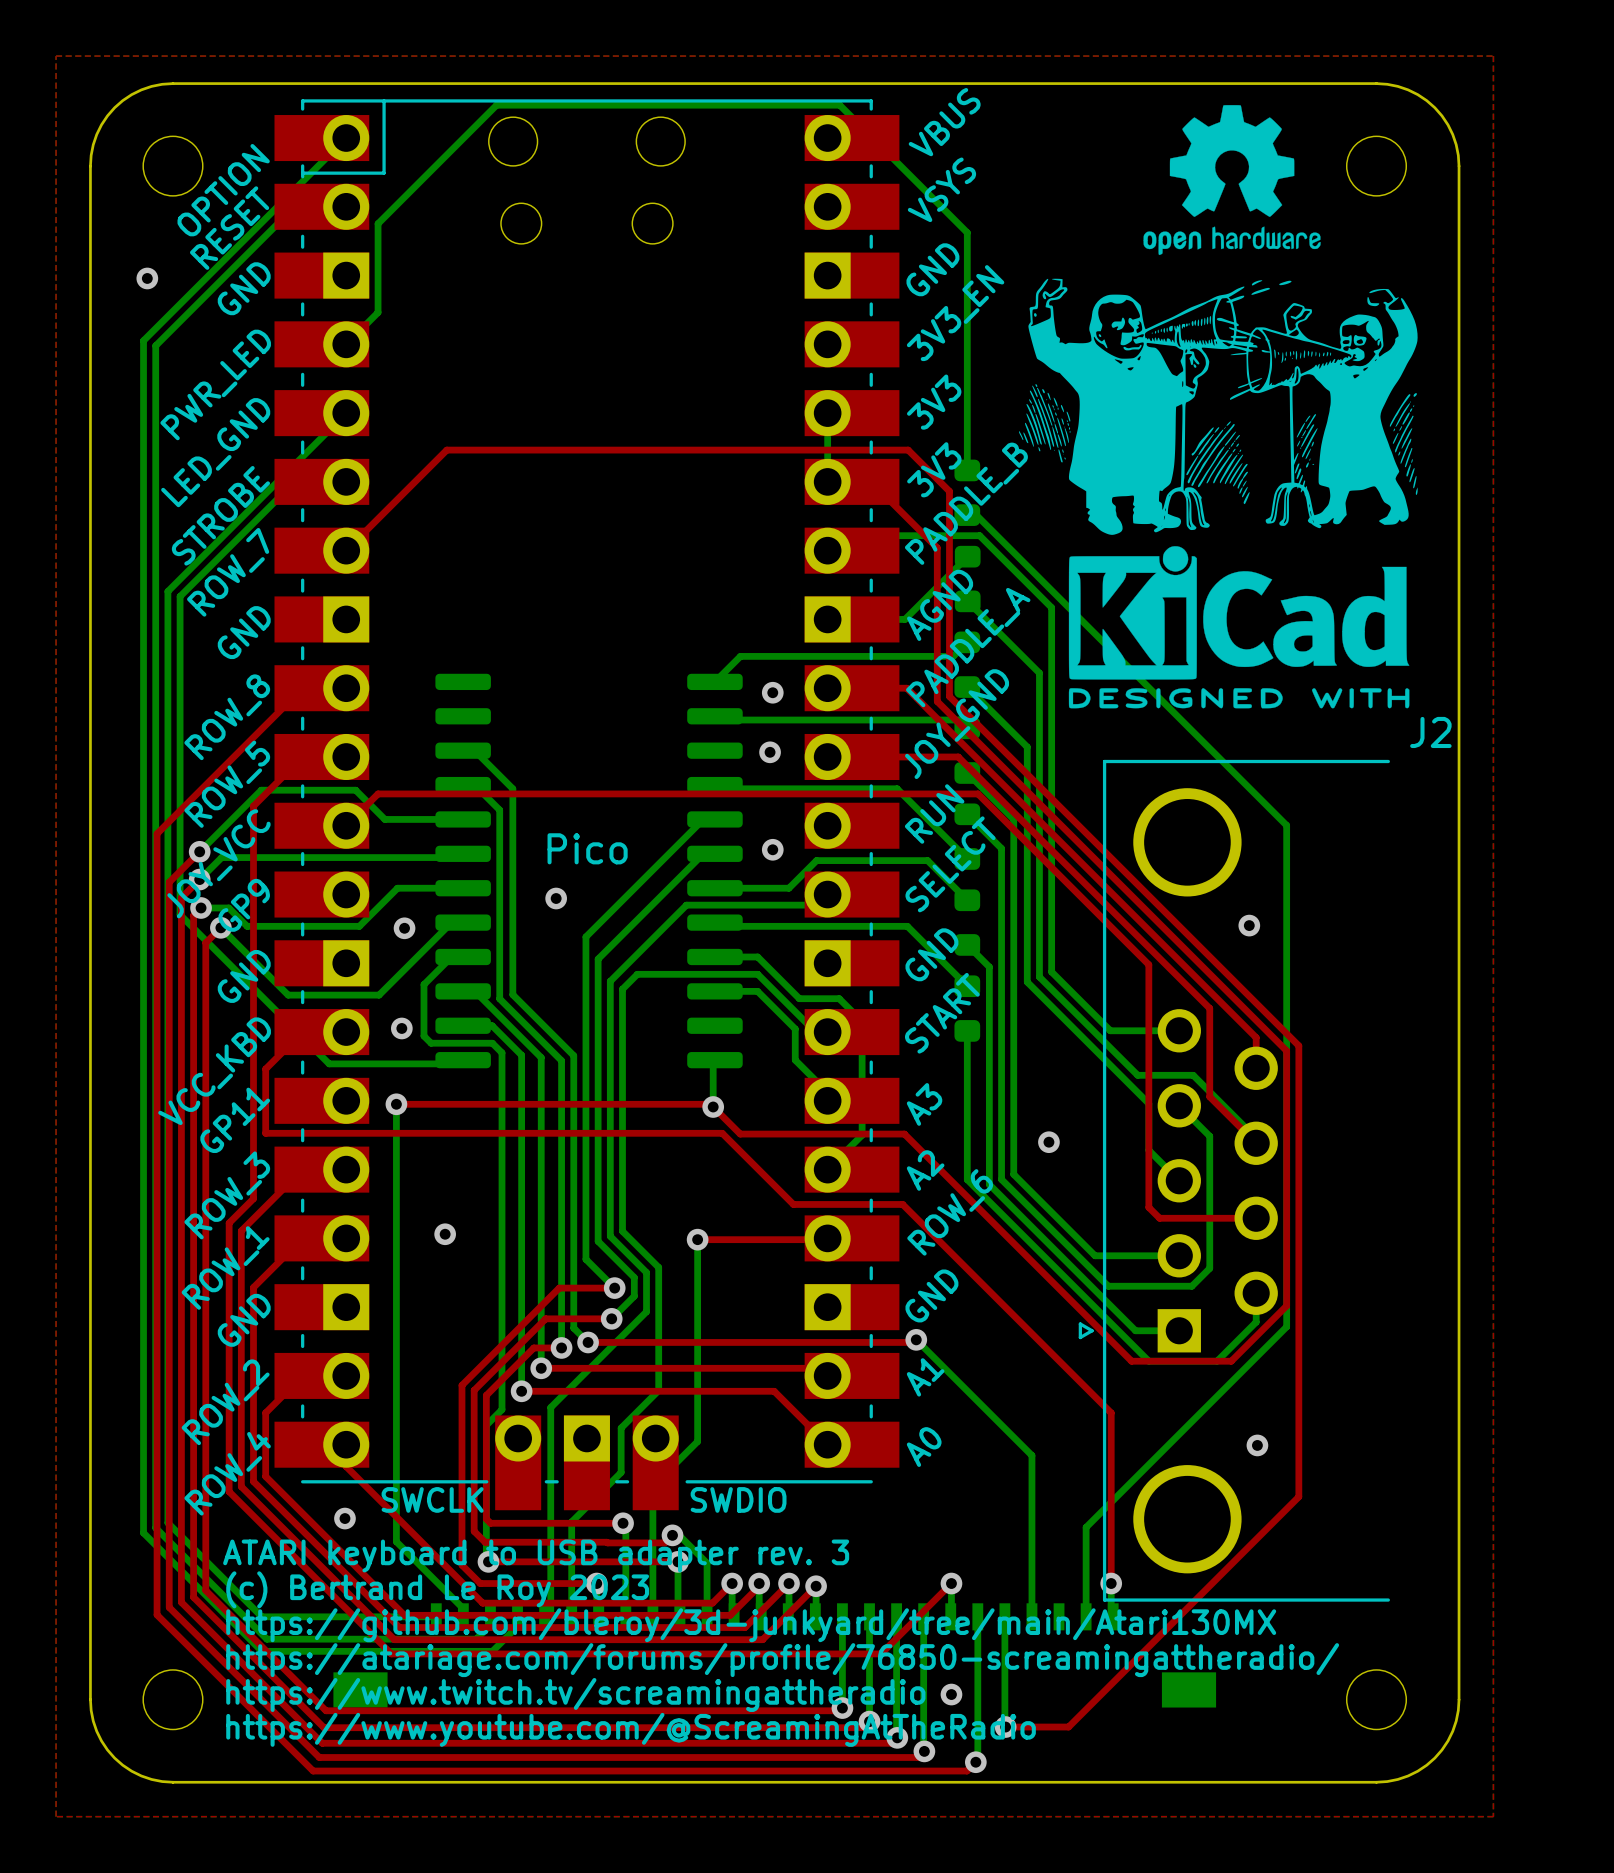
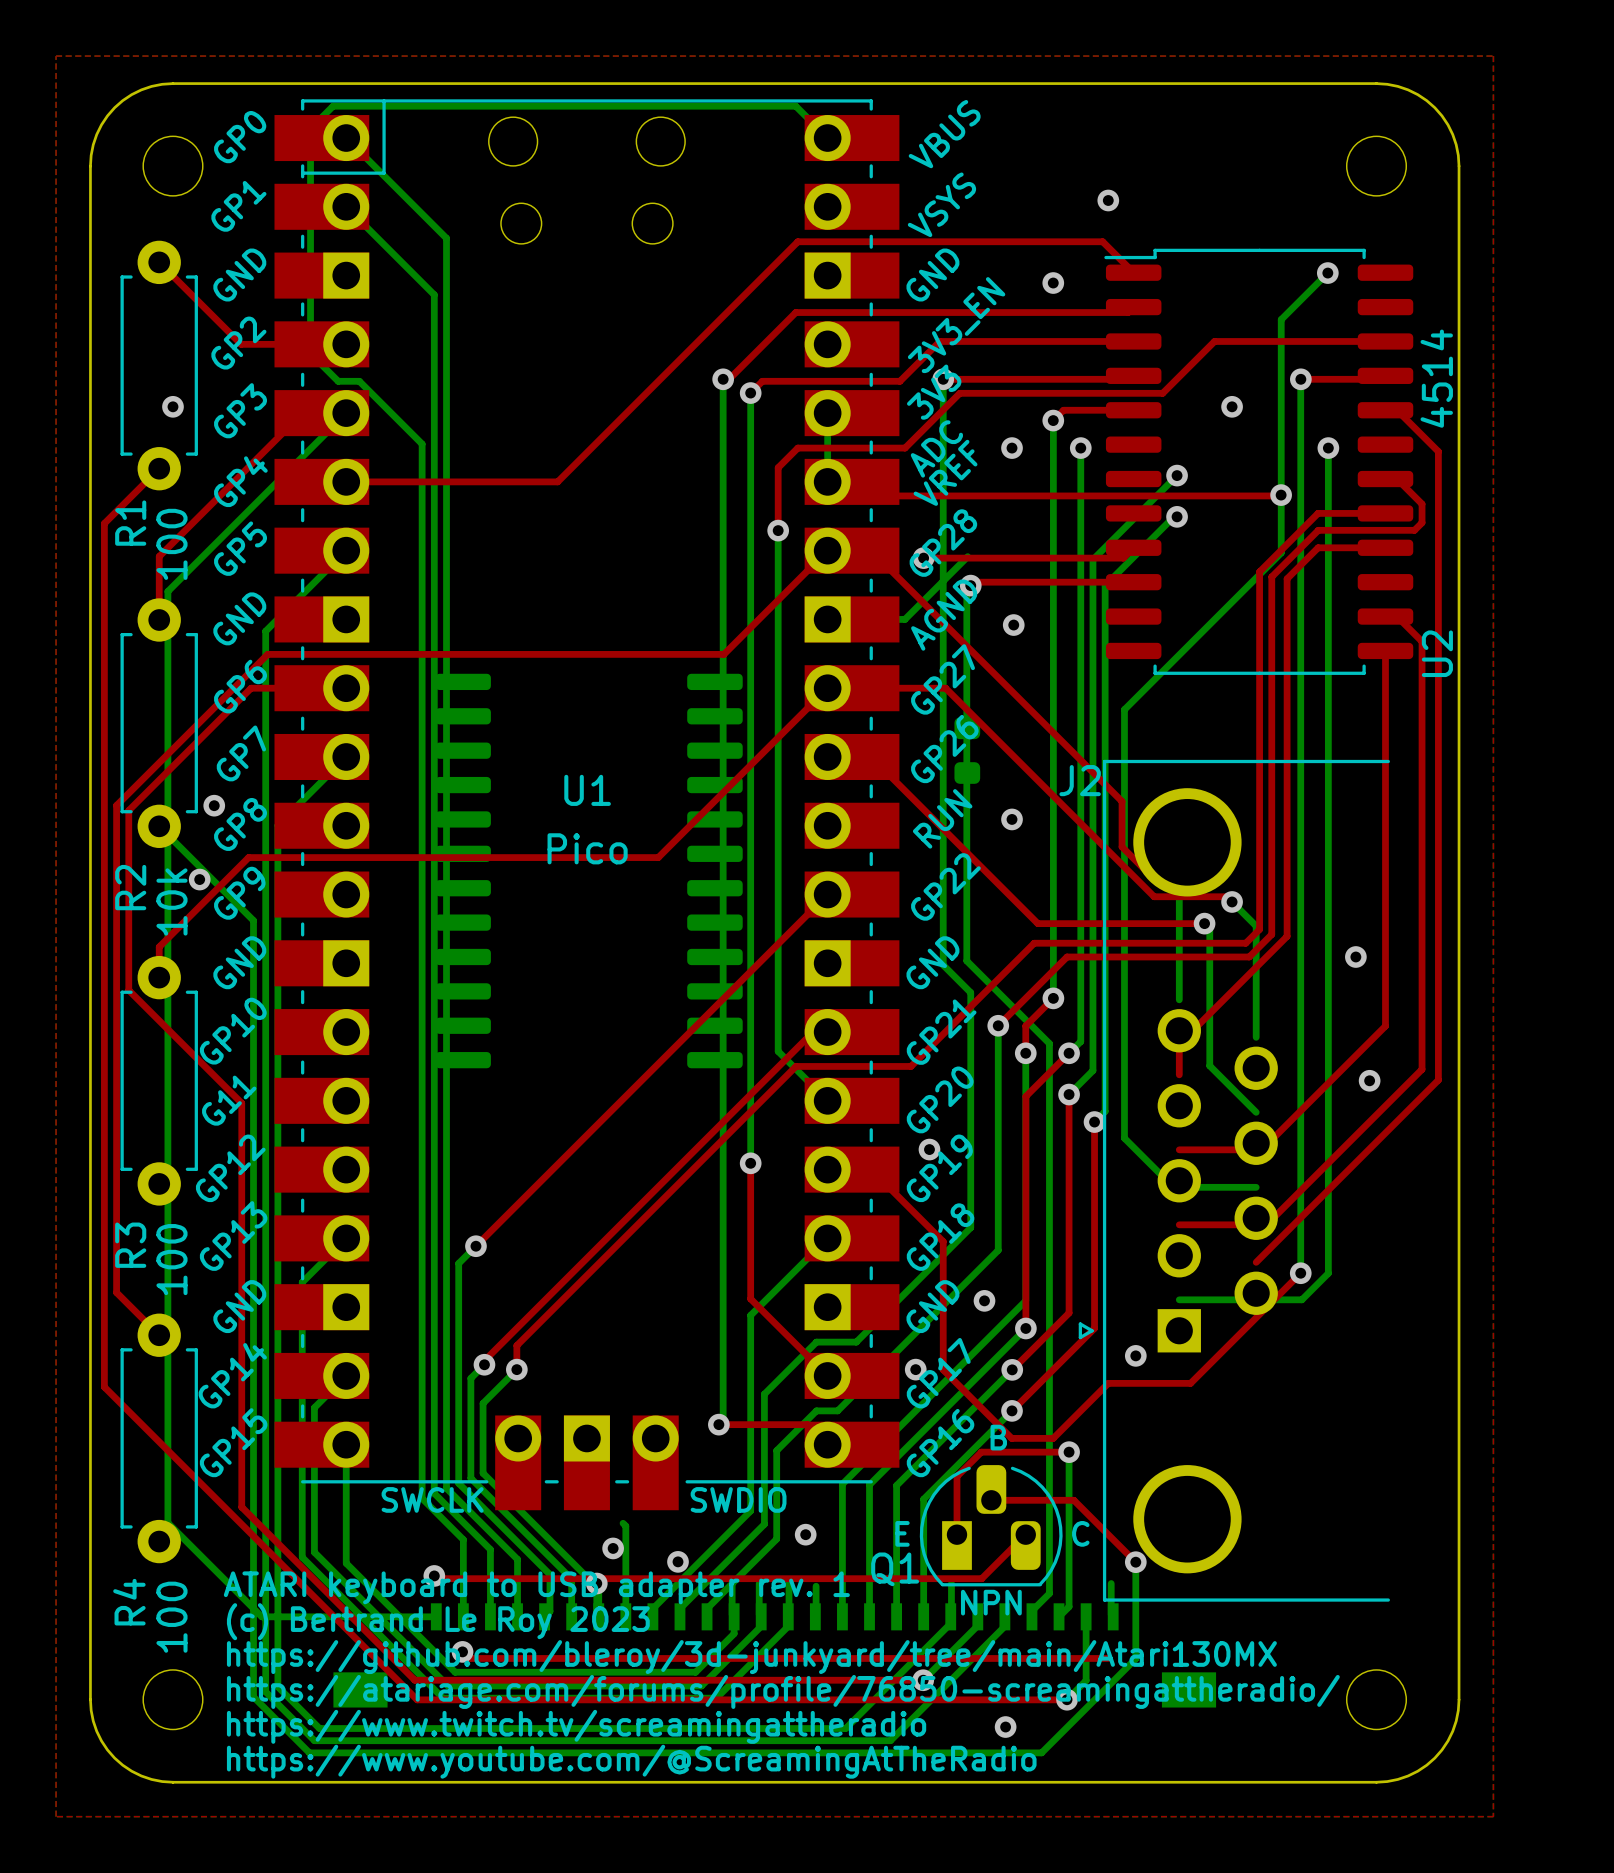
U1 footprint: [274, 99, 900, 1511] -> [274, 99, 900, 1511]
drawing: [1018, 105, 1418, 709] -> none
bottom track: (346, 138) (143, 340) (143, 1532) (261, 1651) (492, 1651) (517, 1626) -> (346, 138) (446, 238) (446, 1488) (517, 1559) (517, 1616)
bottom track: none -> (827, 138) (795, 106) (333, 106) (310, 128) (310, 353) (338, 381) (359, 381) (422, 444) (422, 1498) (463, 1539) (463, 1616)
via: none -> (1108, 200)
bottom track: (346, 206) (294, 206) (155, 345) (155, 1527) (266, 1639) (476, 1639) (490, 1624) -> (346, 206) (434, 294) (434, 1493) (490, 1549) (490, 1616)
top track: none -> (159, 262) (241, 344) (346, 344)
top track: none -> (1133, 272) (1102, 241) (797, 241) (557, 481) (346, 481)
bottom track: none -> (1327, 273) (1281, 319) (1281, 552) (1124, 709) (1124, 1138) (1173, 1187) (1256, 1187)
via: none -> (1327, 273)
via position: (147, 278) -> (172, 406)
via: none -> (1053, 283)
top track: none -> (1133, 307) (1128, 312) (795, 312) (729, 379) (723, 379)
top track: none -> (1133, 341) (939, 341) (899, 381) (762, 381) (750, 393)
top track: none -> (1385, 341) (1214, 341) (1162, 393) (959, 393) (905, 448) (797, 448) (778, 467) (778, 530)
bottom track: (346, 344) (378, 312) (378, 223) (496, 105) (839, 105) (967, 232) (967, 470) -> none
R1: none -> 100 (159, 365)
bottom track: none -> (723, 379) (723, 1420) (718, 1424)
via: none -> (723, 379)
bottom track: none -> (943, 379) (943, 965) (970, 992) (970, 1227) (856, 1342) (816, 1342) (764, 1394) (764, 1524) (679, 1608)
top track: none -> (943, 379) (1130, 379)
via: none -> (943, 379)
bottom track: none -> (1300, 379) (1300, 1273)
top track: none -> (1300, 379) (1382, 379)
via: none -> (1300, 379)
bottom track: none -> (750, 393) (750, 1163)
via: none -> (750, 393)
via: none -> (1232, 406)
top track: none -> (1133, 410) (1063, 410) (1053, 420)
top track: none -> (1397, 410) (1438, 451) (1438, 1080) (1256, 1262)
top track: none -> (302, 413) (159, 556) (159, 620)
bottom track: none -> (1053, 420) (1053, 998)
via: none -> (1053, 420)
via: none -> (1012, 448)
bottom track: none -> (1080, 448) (1080, 1041) (1069, 1053)
via: none -> (1080, 448)
bottom track: none -> (1328, 448) (1328, 1273) (1301, 1299) (1179, 1299)
via: none -> (1328, 448)
U2: none -> 4514 (1258, 461)
top track: none -> (159, 468) (104, 523) (104, 1387) (417, 1699) (1066, 1699)
bottom track: none -> (1177, 475) (1092, 559) (1092, 1070) (1069, 1094)
via: none -> (1177, 475)
top track: none -> (1397, 479) (1422, 504) (1422, 522) (1414, 530) (1318, 530) (1271, 576) (1271, 934) (1249, 956) (1067, 956) (998, 1025)
bottom track: (346, 481) (294, 481) (180, 596) (180, 914) (329, 1063) (459, 1063) -> none
top track: (871, 481) (937, 547) (937, 701) (1286, 1050) (1286, 1305) (1231, 1361) (1131, 1361) (904, 1134) (740, 1134) (710, 1104) (396, 1104) -> none
part: (967, 492) -> none
top track: none -> (1281, 495) (841, 495)
via: none -> (1281, 495)
top track: none -> (1385, 513) (1318, 513) (1259, 571) (1259, 929) (1245, 943) (1034, 943) (910, 1066) (795, 1066) (516, 1345) (516, 1369)
bottom track: (976, 515) (1286, 825) (1286, 1326) (1086, 1527) (1086, 1616) -> (1067, 1699) (1086, 1680) (1086, 1616)
bottom track: none -> (1177, 516) (1173, 516) (1105, 585) (1105, 1111) (1094, 1122)
via: none -> (1177, 516)
bottom track: none -> (778, 530) (778, 1051) (827, 1100)
via: none -> (778, 530)
top track: none -> (1133, 547) (1123, 558) (923, 558)
top track: none -> (1385, 547) (1318, 547) (1287, 578) (1287, 936) (1179, 1044) (1179, 1074)
bottom track: none -> (346, 550) (265, 631) (265, 1691) (314, 1740) (890, 1740) (1004, 1626)
top track: (346, 550) (446, 450) (908, 450) (949, 491) (949, 696) (1298, 1045) (1298, 1496) (1068, 1727) (1005, 1727) -> none
bottom track: (827, 550) (842, 535) (979, 535) (1051, 607) (1051, 971) (1110, 1030) (1179, 1030) -> none
top track: none -> (827, 550) (723, 654) (267, 654) (116, 805) (116, 1292) (159, 1335)
top track: none -> (871, 550) (1122, 801) (1122, 846) (1152, 877) (1162, 877)
via: none -> (923, 558)
part: (967, 579) -> none
top track: none -> (1133, 582) (974, 582) (970, 585)
bottom track: none -> (970, 585) (966, 589) (966, 960) (1049, 1043) (1049, 1593) (1031, 1611)
via: none -> (970, 585)
bottom track: (967, 601) (1039, 673) (1039, 977) (1137, 1075) (1193, 1075) (1256, 1138) -> none
top track: none -> (1397, 616) (1422, 641) (1422, 1069) (1266, 1224) (1179, 1224)
via: none -> (1013, 625)
bottom track: (967, 642) (953, 656) (740, 656) (714, 681) -> none
top track: none -> (1385, 650) (1385, 1026) (1261, 1149) (1179, 1149)
part: (967, 664) -> none
bottom track: (967, 687) (1027, 747) (1027, 982) (1148, 1103) (1148, 1150) (1179, 1180) -> none
top track: (302, 688) (157, 833) (157, 1614) (313, 1771) (967, 1771) (975, 1762) -> none
top track: none -> (346, 688) (251, 688) (128, 810) (128, 990) (241, 1103) (241, 1507) (414, 1680) (923, 1680)
top track: none -> (827, 688) (658, 857) (248, 857) (159, 946) (159, 977)
top track: (906, 688) (1256, 1037) (1256, 1068) -> (906, 688) (945, 688) (1154, 896) (1226, 896) (1232, 901)
via: (772, 692) -> none
bottom track: (718, 720) (958, 720) (967, 728) -> none
R2: none -> 10k (159, 723)
J2 name position: J2 (1430, 732) -> J2 (1080, 780)
bottom track: (474, 750) (512, 788) (512, 994) (573, 1055) (573, 1328) (588, 1342) -> none
via: (770, 752) -> none
bottom track: none -> (346, 756) (277, 825) (277, 1686) (319, 1728) (845, 1728) (950, 1623)
top track: (346, 756) (302, 756) (253, 806) (253, 1198) (229, 1223) (229, 1491) (391, 1653) (881, 1653) (951, 1583) -> none
top track: (827, 756) (958, 756) (1209, 1008) (1209, 1096) (1256, 1143) -> none
top track: none -> (871, 756) (1037, 923) (1204, 923)
bottom track: (967, 773) (1013, 819) (1013, 1174) (1095, 1255) (1179, 1255) -> none
bottom track: (474, 785) (499, 810) (499, 998) (561, 1060) (561, 1347) -> none
bottom track: (718, 788) (897, 788) (967, 858) -> none
U1 name: none -> U1 (587, 790)
bottom track: (967, 814) (1001, 848) (1001, 1179) (1108, 1286) (1191, 1286) (1209, 1268) (1209, 1136) (1179, 1105) -> none
bottom track: (463, 819) (384, 819) (355, 790) (261, 790) (199, 851) -> none
bottom track: (703, 819) (585, 936) (585, 1259) (614, 1288) -> none
via: none -> (1012, 819)
top track: (346, 825) (378, 793) (978, 793) (1148, 964) (1148, 1207) (1159, 1218) (1256, 1218) -> none
bottom track: none -> (159, 826) (253, 920) (253, 1696) (309, 1752) (1041, 1752) (1135, 1658) (1135, 1562)
part: (967, 836) -> none
via: (772, 849) -> none
top track: (199, 851) (169, 882) (169, 1607) (319, 1757) (918, 1757) (924, 1751) -> none
via position: (199, 851) -> (214, 805)
bottom track: (703, 853) (598, 959) (598, 1241) (634, 1277) (634, 1296) (611, 1318) -> none
bottom track: (459, 857) (221, 857) (199, 879) -> none
bottom track: none -> (1162, 877) (1179, 894) (1179, 999)
top track: (199, 879) (181, 897) (181, 1602) (322, 1743) (891, 1743) (897, 1737) -> none
bottom track: (463, 888) (397, 888) (359, 926) (247, 926) (228, 907) (201, 907) -> none
bottom track: (714, 888) (788, 888) (816, 860) (927, 860) (967, 900) -> none
top track: none -> (827, 894) (475, 1246)
via: (556, 898) -> none
bottom track: none -> (1232, 901) (1256, 926) (1256, 1037)
via: none -> (1232, 901)
bottom track: (817, 905) (686, 905) (610, 981) (610, 1236) (646, 1272) (646, 1311) (550, 1407) (549, 1611) -> (475, 1246) (458, 1263) (458, 1483) (549, 1574) (549, 1611)
top track: (201, 907) (193, 915) (193, 1597) (323, 1727) (863, 1727) (869, 1721) -> none
via: (201, 907) -> none
bottom track: (451, 922) (379, 995) (288, 995) (220, 927) -> none
part: (967, 922) -> none
bottom track: none -> (1204, 923) (1209, 928) (1209, 1065) (1256, 1112)
via: none -> (1204, 923)
via: (1249, 925) -> none
bottom track: (718, 926) (907, 926) (967, 986) -> none
top track: (220, 927) (205, 942) (205, 1590) (326, 1710) (839, 1710) (842, 1708) -> none
via: (220, 927) -> none
via: (404, 928) -> none
bottom track: (967, 944) (989, 967) (989, 1184) (1135, 1330) (1179, 1330) -> none
bottom track: (451, 956) (423, 984) (423, 1036) (431, 1043) (492, 1043) (502, 1052) (502, 1409) (486, 1425) (486, 1559) (488, 1561) -> none
bottom track: (714, 956) (757, 956) (799, 998) (839, 998) (862, 1021) (862, 1135) (827, 1169) -> none
via: none -> (1355, 956)
bottom track: (475, 991) (541, 1057) (541, 1368) -> none
bottom track: (714, 991) (757, 991) (795, 1029) (795, 1060) (827, 1092) -> none
top track: none -> (1053, 998) (1025, 1026) (1025, 1053)
via: none -> (1053, 998)
part: (967, 1008) -> none
bottom track: (463, 1025) (492, 1025) (521, 1055) (521, 1391) -> none
bottom track: none -> (998, 1025) (998, 1250) (837, 1410) (816, 1410) (776, 1450) (776, 1539) (707, 1608)
via: none -> (998, 1025)
via: (401, 1028) -> none
bottom track: (967, 1030) (967, 1179) (1148, 1361) (1217, 1361) (1256, 1322) (1256, 1293) -> none
top track: (302, 1032) (265, 1069) (265, 1133) (722, 1133) (793, 1204) (902, 1204) (1111, 1412) (1111, 1583) -> none
top track: none -> (813, 1032) (484, 1360) (484, 1364)
bottom track: (815, 1032) (757, 974) (637, 974) (622, 989) (622, 1231) (658, 1267) (658, 1390) (621, 1428) (621, 1472) (571, 1521) (571, 1579) -> (484, 1364) (470, 1378) (470, 1478) (571, 1579)
via: none -> (1025, 1053)
top track: none -> (1069, 1053) (1025, 1096) (1025, 1328)
via: none -> (1069, 1053)
bottom track: (713, 1061) (713, 1106) -> none
R3: none -> 100 (159, 1080)
via: none -> (1369, 1080)
top track: none -> (1069, 1094) (1069, 1313) (1012, 1369)
via: none -> (1069, 1094)
bottom track: (396, 1104) (396, 1541) (463, 1608) -> none
via: (396, 1104) -> none
via: (713, 1106) -> none
top track: none -> (1094, 1122) (1094, 1328) (1012, 1410)
via: none -> (1094, 1122)
via: (1048, 1142) -> none
via: none -> (929, 1149)
top track: none -> (750, 1163) (750, 1298) (827, 1375)
via: none -> (750, 1163)
top track: (302, 1169) (241, 1230) (241, 1486) (394, 1639) (762, 1639) (816, 1586) -> none
top track: none -> (871, 1169) (943, 1241) (943, 1369) (1011, 1438) (1053, 1438) (1108, 1383) (1190, 1383) (1300, 1273)
via position: (445, 1234) -> (475, 1246)
top track: (302, 1238) (253, 1287) (253, 1481) (399, 1627) (745, 1627) (789, 1583) -> none
bottom track: none -> (346, 1238) (302, 1282) (302, 1557) (443, 1698) (716, 1698) (788, 1626)
bottom track: none -> (827, 1238) (750, 1315) (750, 1510) (652, 1608)
bottom track: (697, 1239) (697, 1441) (652, 1486) (652, 1616) -> none
top track: (697, 1239) (826, 1239) -> none
via: (697, 1239) -> none
via: none -> (1300, 1273)
top track: (614, 1288) (559, 1288) (461, 1385) (461, 1565) (480, 1583) (596, 1583) -> none
via: (614, 1288) -> none
via: none -> (984, 1300)
top track: (611, 1318) (545, 1318) (474, 1390) (474, 1531) (485, 1542) (664, 1542) (672, 1535) -> none
via: (611, 1318) -> none
via: none -> (1025, 1328)
bottom track: (916, 1339) (1031, 1455) (1031, 1616) -> none
top track: (916, 1339) (913, 1342) (588, 1342) -> none
via position: (916, 1339) -> (915, 1369)
via: (588, 1342) -> none
top track: (561, 1347) (533, 1347) (486, 1395) (486, 1519) (490, 1523) (623, 1523) -> none
via: (561, 1347) -> none
via: none -> (1135, 1355)
via: none -> (484, 1364)
top track: (541, 1368) (820, 1368) -> none
via: (541, 1368) -> none
bottom track: none -> (516, 1369) (483, 1403) (483, 1473) (598, 1588) (598, 1616)
via: none -> (1012, 1369)
top track: (302, 1375) (265, 1412) (265, 1476) (404, 1615) (730, 1615) (759, 1586) (759, 1583) -> none
bottom track: none -> (346, 1375) (314, 1407) (314, 1552) (448, 1685) (701, 1685) (761, 1626)
top track: (521, 1391) (774, 1391) (807, 1424) -> (718, 1424) (807, 1424)
via position: (521, 1391) -> (516, 1369)
via: none -> (1012, 1410)
via: none -> (718, 1424)
text: none -> B (998, 1437)
R4: none -> 100 (159, 1438)
bottom track: none -> (346, 1444) (346, 1563) (455, 1672) (695, 1672) (734, 1633) (734, 1616)
top track: (346, 1444) (346, 1466) (482, 1603) (712, 1603) (732, 1583) -> none
via: (1257, 1445) -> none
bottom track: none -> (1069, 1452) (1069, 1606) (1059, 1616)
top track: none -> (1069, 1452) (981, 1452) (956, 1476) (956, 1534)
via: none -> (1069, 1452)
top track: none -> (991, 1500) (1073, 1500) (1135, 1562)
via: (344, 1518) -> none
via position: (623, 1523) -> (613, 1548)
Q1: none -> (991, 1525)
text: none -> E (902, 1533)
text: none -> C (1080, 1533)
via: none -> (805, 1534)
top track: none -> (1025, 1534) (981, 1578) (437, 1578) (434, 1575)
bottom track: (672, 1535) (679, 1535) (707, 1563) (707, 1616) -> none
via: (672, 1535) -> none
text: ATARI keyboard to USB adapter rev. 3 (536, 1556) -> ATARI keyboard to USB adapter rev. 1 (536, 1587)
top track: (488, 1561) (678, 1561) -> none
via: (488, 1561) -> none
bottom track: (678, 1561) (678, 1614) -> none
via: none -> (434, 1575)
via: (732, 1583) -> none
via: (759, 1583) -> none
via: (789, 1583) -> none
via: (951, 1583) -> none
via position: (1111, 1583) -> (1135, 1562)
via: (816, 1586) -> none
text position: (c) Bertrand Le Roy 2023 (437, 1589) -> (c) Bertrand Le Roy 2023 (438, 1621)
text: none -> NPN (991, 1602)
bottom track: (842, 1616) (842, 1708) -> (842, 1616) (842, 1484) (1025, 1300) (1025, 1053)
bottom track: (869, 1616) (869, 1721) -> (869, 1616) (869, 1484) (1025, 1328)
bottom track: (896, 1616) (897, 1737) -> (896, 1616) (896, 1485) (1012, 1369)
bottom track: (923, 1616) (924, 1751) -> (923, 1616) (923, 1499) (1012, 1410)
bottom track: (977, 1616) (977, 1760) (975, 1762) -> none
bottom track: (1004, 1616) (1005, 1727) -> none
text position: https://github.com/bleroy/3d-junkyard/tree/main/Atari130MX (751, 1625) -> https://github.com/bleroy/3d-junkyard/tree/main/Atari130MX (751, 1657)
bottom track: none -> (977, 1625) (923, 1680)
top track: none -> (462, 1651) (469, 1658) (1108, 1658)
via: none -> (462, 1651)
text position: https://atariage.com/forums/profile/76850-screamingattheradio/ (782, 1660) -> https://atariage.com/forums/profile/76850-screamingattheradio/ (783, 1691)
via: none -> (923, 1680)
text position: https://www.twitch.tv/screamingattheradio (575, 1694) -> https://www.twitch.tv/screamingattheradio (576, 1726)
via: (951, 1694) -> none
via: none -> (1067, 1699)
via: (842, 1708) -> none
via: (869, 1721) -> none
text position: https://www.youtube.com/@ScreamingAtTheRadio (631, 1729) -> https://www.youtube.com/@ScreamingAtTheRadio (631, 1761)
via: (897, 1737) -> none
via: (924, 1751) -> none
via: (975, 1762) -> none

